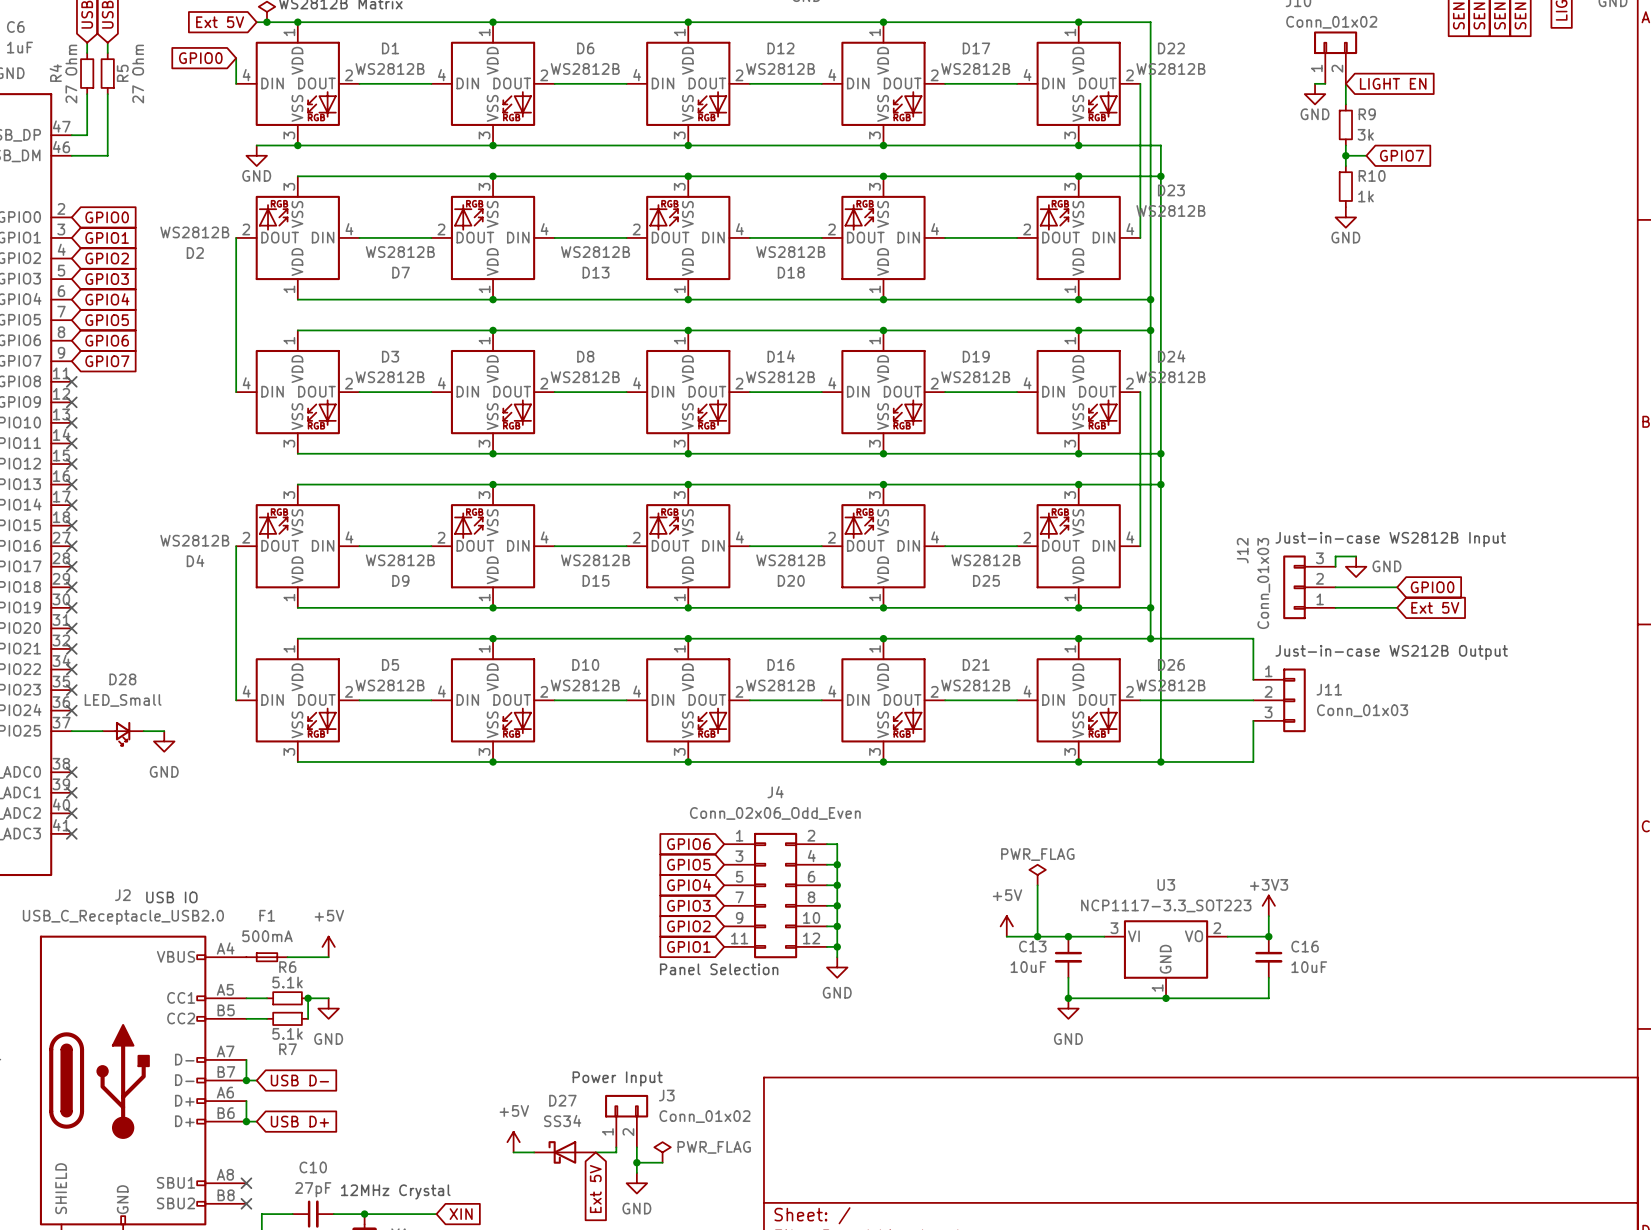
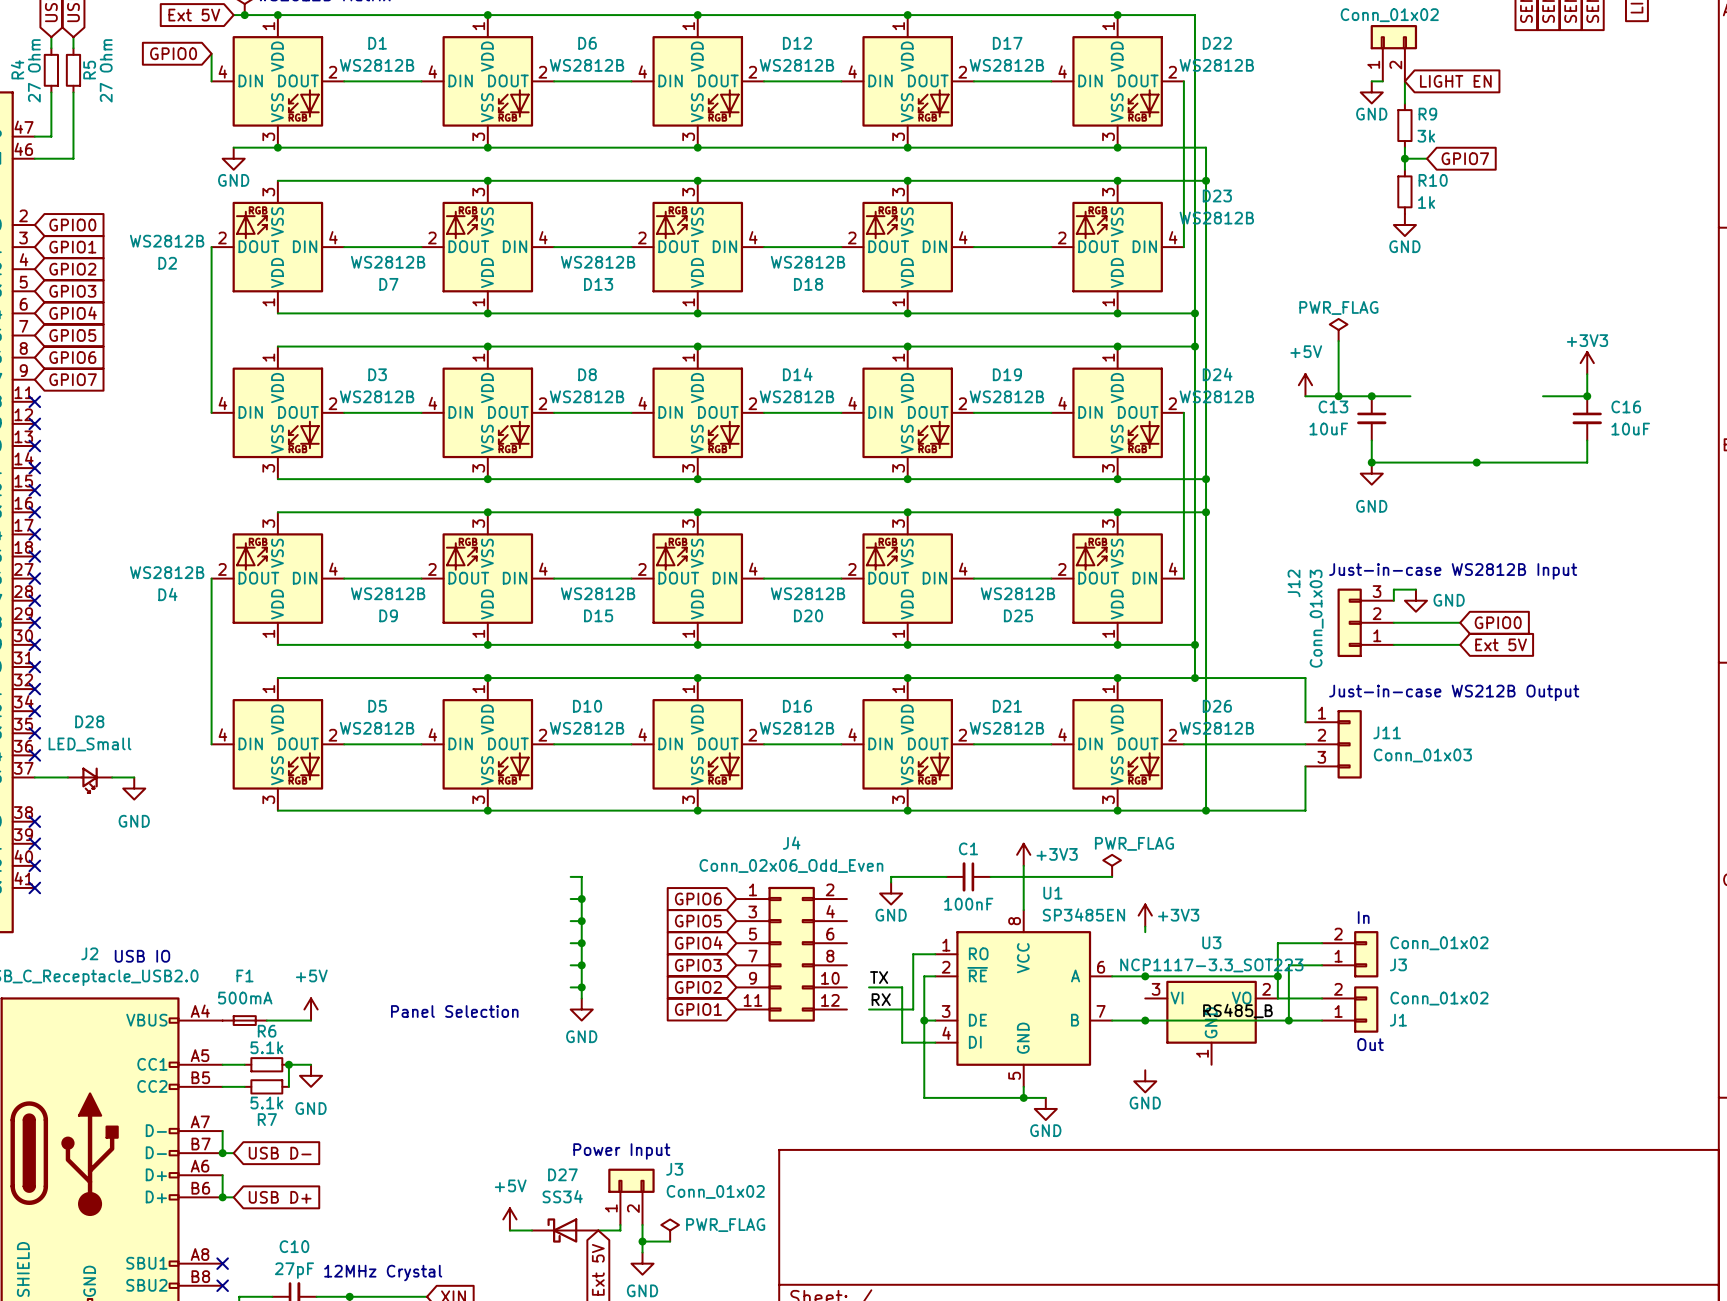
power symbol: none -> PWR_FLAG (1338, 329)
wire: none -> (1338, 341) (1338, 396)
power symbol: none -> +3V3 (1587, 363)
wire: none -> (1587, 374) (1587, 396) (1543, 396)
power symbol: none -> +5V (1305, 385)
wire: none -> (1305, 396) (1410, 396)
junction: none -> (1338, 396)
junction: none -> (1371, 396)
junction: none -> (1587, 396)
wire: none -> (1371, 440) (1371, 462) (1587, 462) (1587, 440)
junction: none -> (1371, 462)
junction: none -> (1476, 462)
power symbol: none -> GND (1371, 473)
power symbol: none -> +3V3 (1023, 854)
wire: none -> (1023, 865) (1023, 910)
wire: none -> (570, 876) (581, 876) (581, 998)
wire: none -> (946, 876) (891, 876) (891, 882)
C1: none -> 100nF (968, 876)
wire: none -> (990, 876) (1112, 876)
power symbol: none -> GND (891, 893)
wire: none -> (570, 899) (581, 899)
junction: none -> (581, 899)
wire: (826, 844) (837, 844) (837, 957) -> none
power symbol text position: PWR_FLAG (1037, 854) -> PWR_FLAG (1134, 843)
power symbol: none -> +3V3 (1145, 915)
text: none -> In (1363, 917)
wire: none -> (570, 921) (581, 921)
junction: none -> (581, 921)
wire: (826, 864) (837, 864) -> none
junction: (837, 864) -> none
wire: none -> (1145, 926) (1145, 932)
power symbol position: PWR_FLAG (1037, 875) -> PWR_FLAG (1112, 865)
wire: none -> (570, 943) (581, 943)
junction: none -> (581, 943)
wire: (826, 885) (837, 885) -> none
junction: (837, 885) -> none
wire: none -> (1322, 943) (1277, 943) (1277, 998)
wire: none -> (935, 954) (913, 954) (913, 1009) (869, 1009)
J3: none -> Conn_01x02 (1350, 954)
wire: none -> (570, 965) (581, 965)
junction: none -> (581, 965)
wire: (826, 905) (837, 905) -> none
junction: (837, 905) -> none
wire: none -> (1322, 965) (1288, 965) (1288, 1020)
power symbol: +3V3 (1268, 905) -> none
wire: none -> (935, 976) (924, 976) (924, 1097) (1045, 1097)
wire: none -> (1112, 976) (1277, 976)
junction: none -> (1145, 976)
junction: none -> (1277, 976)
wire: (1268, 916) (1268, 936) -> none
label: none -> TX (879, 977)
wire: none -> (570, 987) (581, 987)
junction: none -> (581, 987)
wire: (826, 926) (837, 926) -> none
junction: (837, 926) -> none
wire: none -> (869, 987) (902, 987) (902, 1042) (935, 1042)
power symbol: +5V (1006, 926) -> none
U1: none -> SP3485EN (1023, 998)
wire: (1006, 936) (1104, 936) -> none
junction: (1037, 936) -> none
junction: (1068, 936) -> none
junction: (1268, 936) -> none
label: none -> RX (881, 999)
power symbol: none -> GND (581, 1009)
wire: (826, 946) (837, 946) -> (924, 1020) (935, 1020)
junction: (837, 946) -> none
J1: none -> Conn_01x02 (1350, 1009)
text: none -> Panel Selection (454, 1011)
label: none -> RS485_B (1237, 1010)
junction: none -> (924, 1020)
C13 position: (1068, 957) -> (1371, 418)
wire: none -> (1112, 1020) (1322, 1020)
junction: none -> (1145, 1020)
junction: none -> (1288, 1020)
C16 position: (1268, 957) -> (1587, 418)
power symbol: GND (837, 967) -> none
text: Panel Selection (719, 969) -> none
wire: (1068, 977) (1068, 998) (1268, 998) (1268, 977) -> none
text: none -> Out (1370, 1044)
junction: (1068, 998) -> none
junction: (1166, 998) -> none
power symbol: GND (1068, 1008) -> none
power symbol: none -> GND (1145, 1081)
wire: none -> (1023, 1086) (1023, 1097)
junction: none -> (1023, 1097)
power symbol: none -> GND (1045, 1108)

